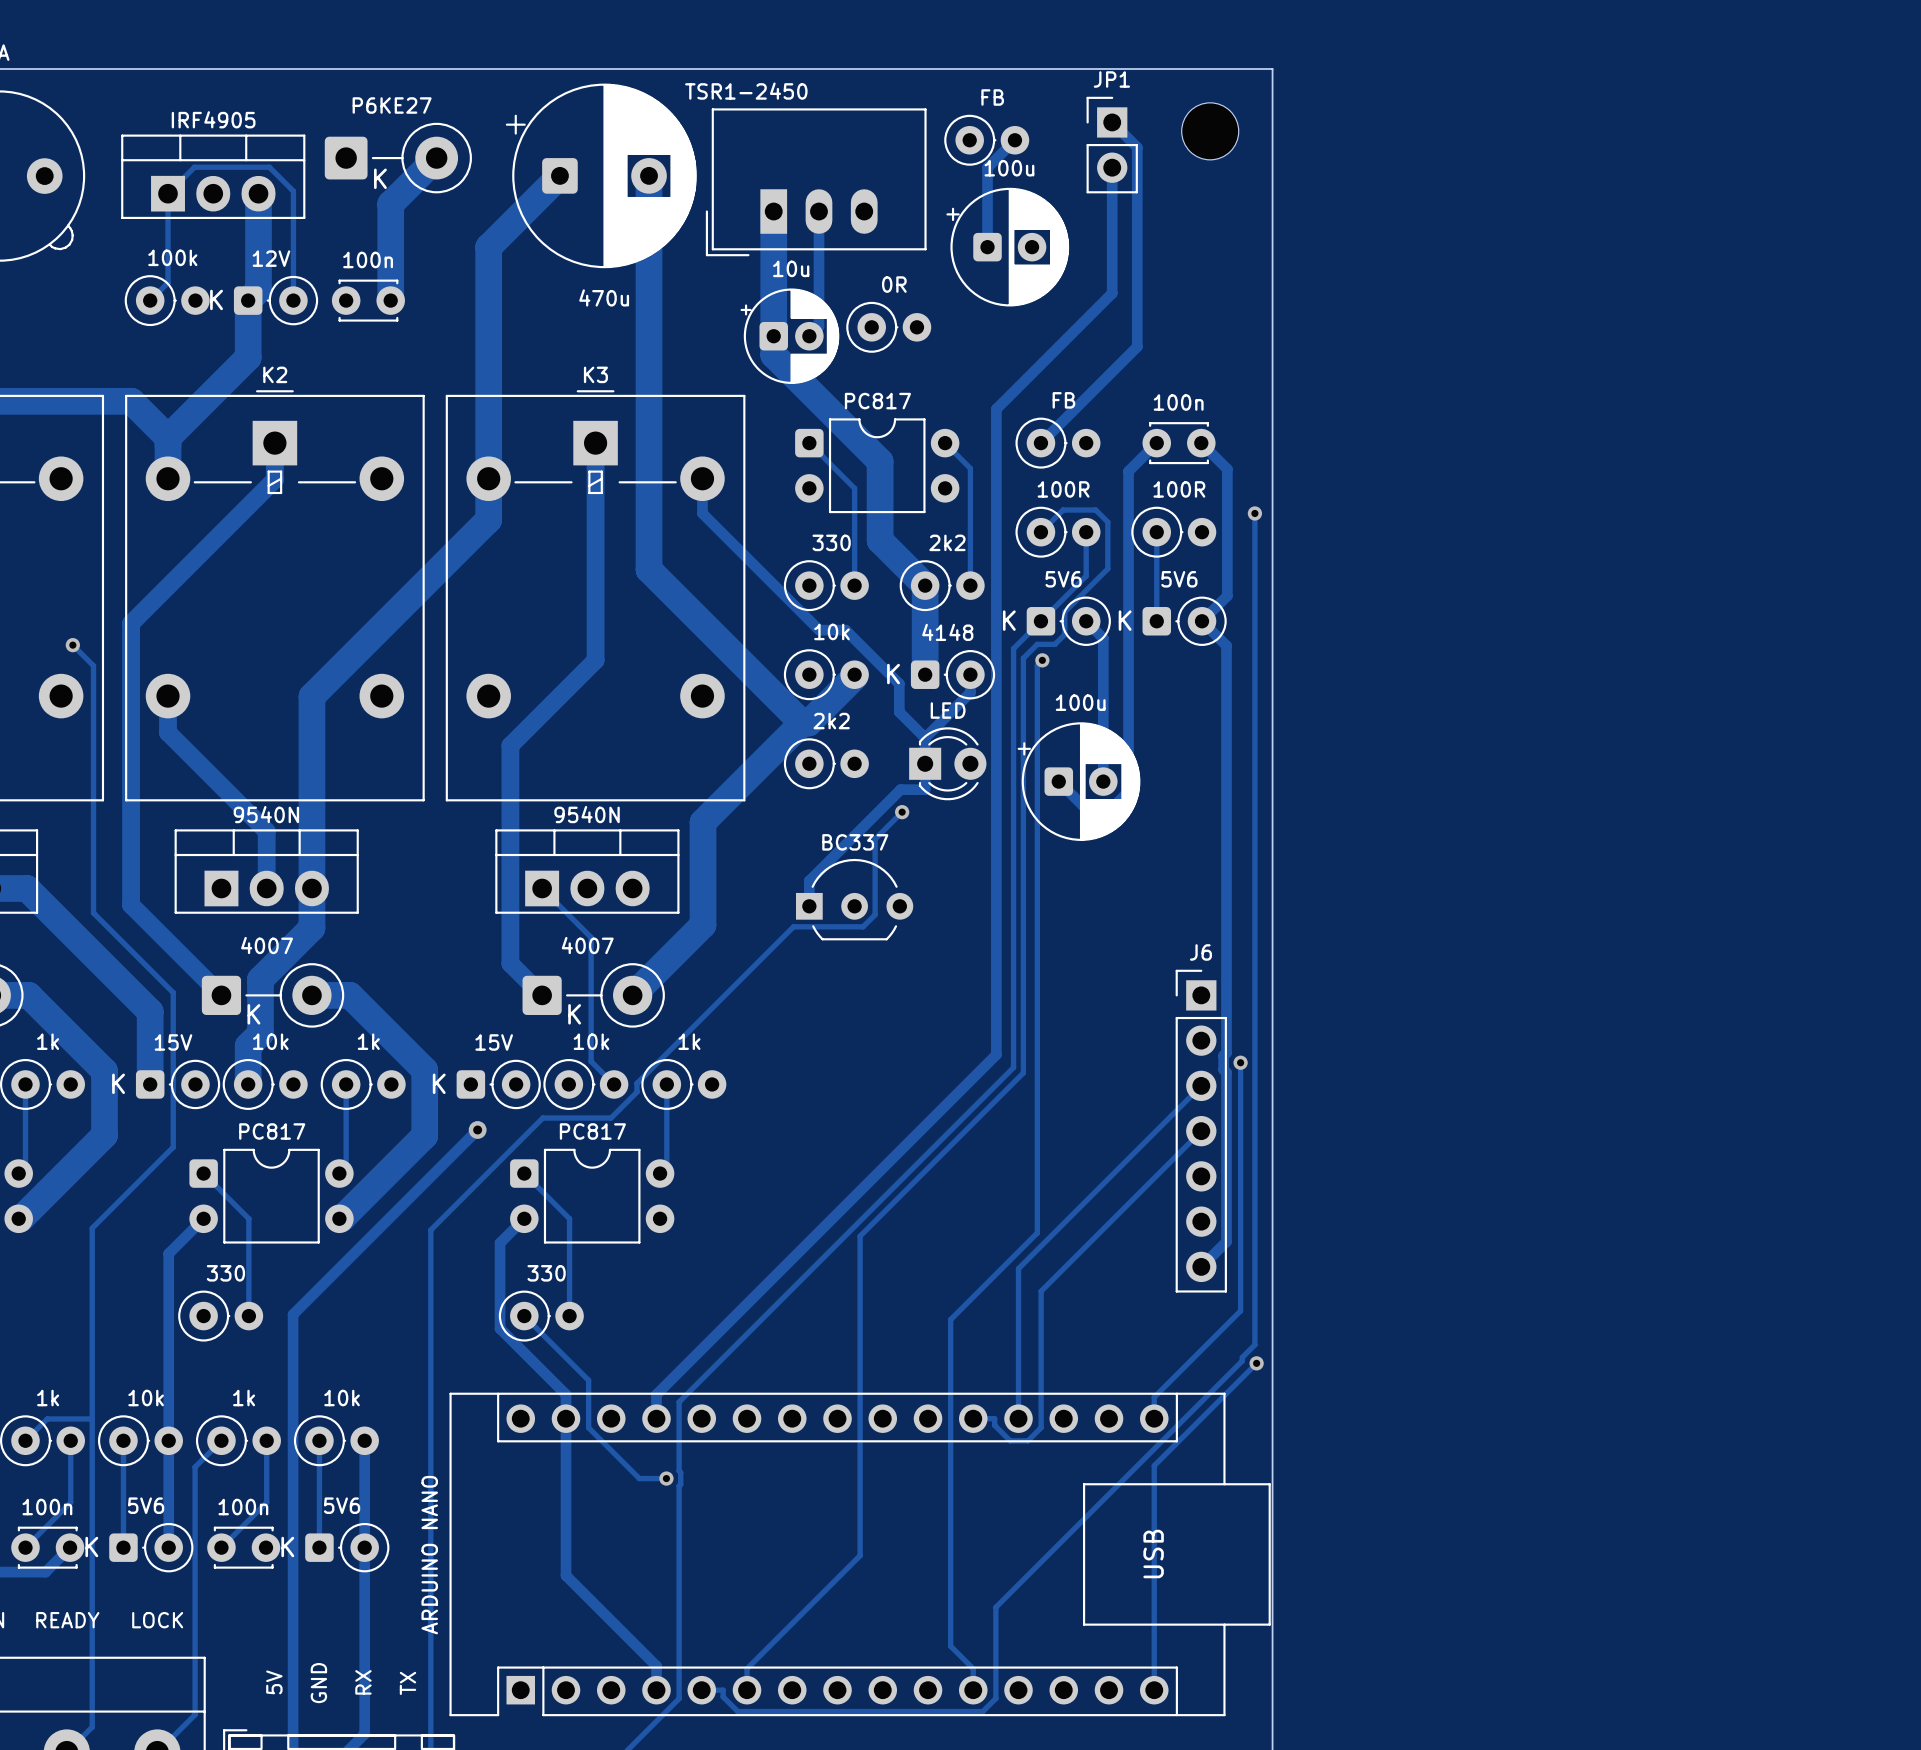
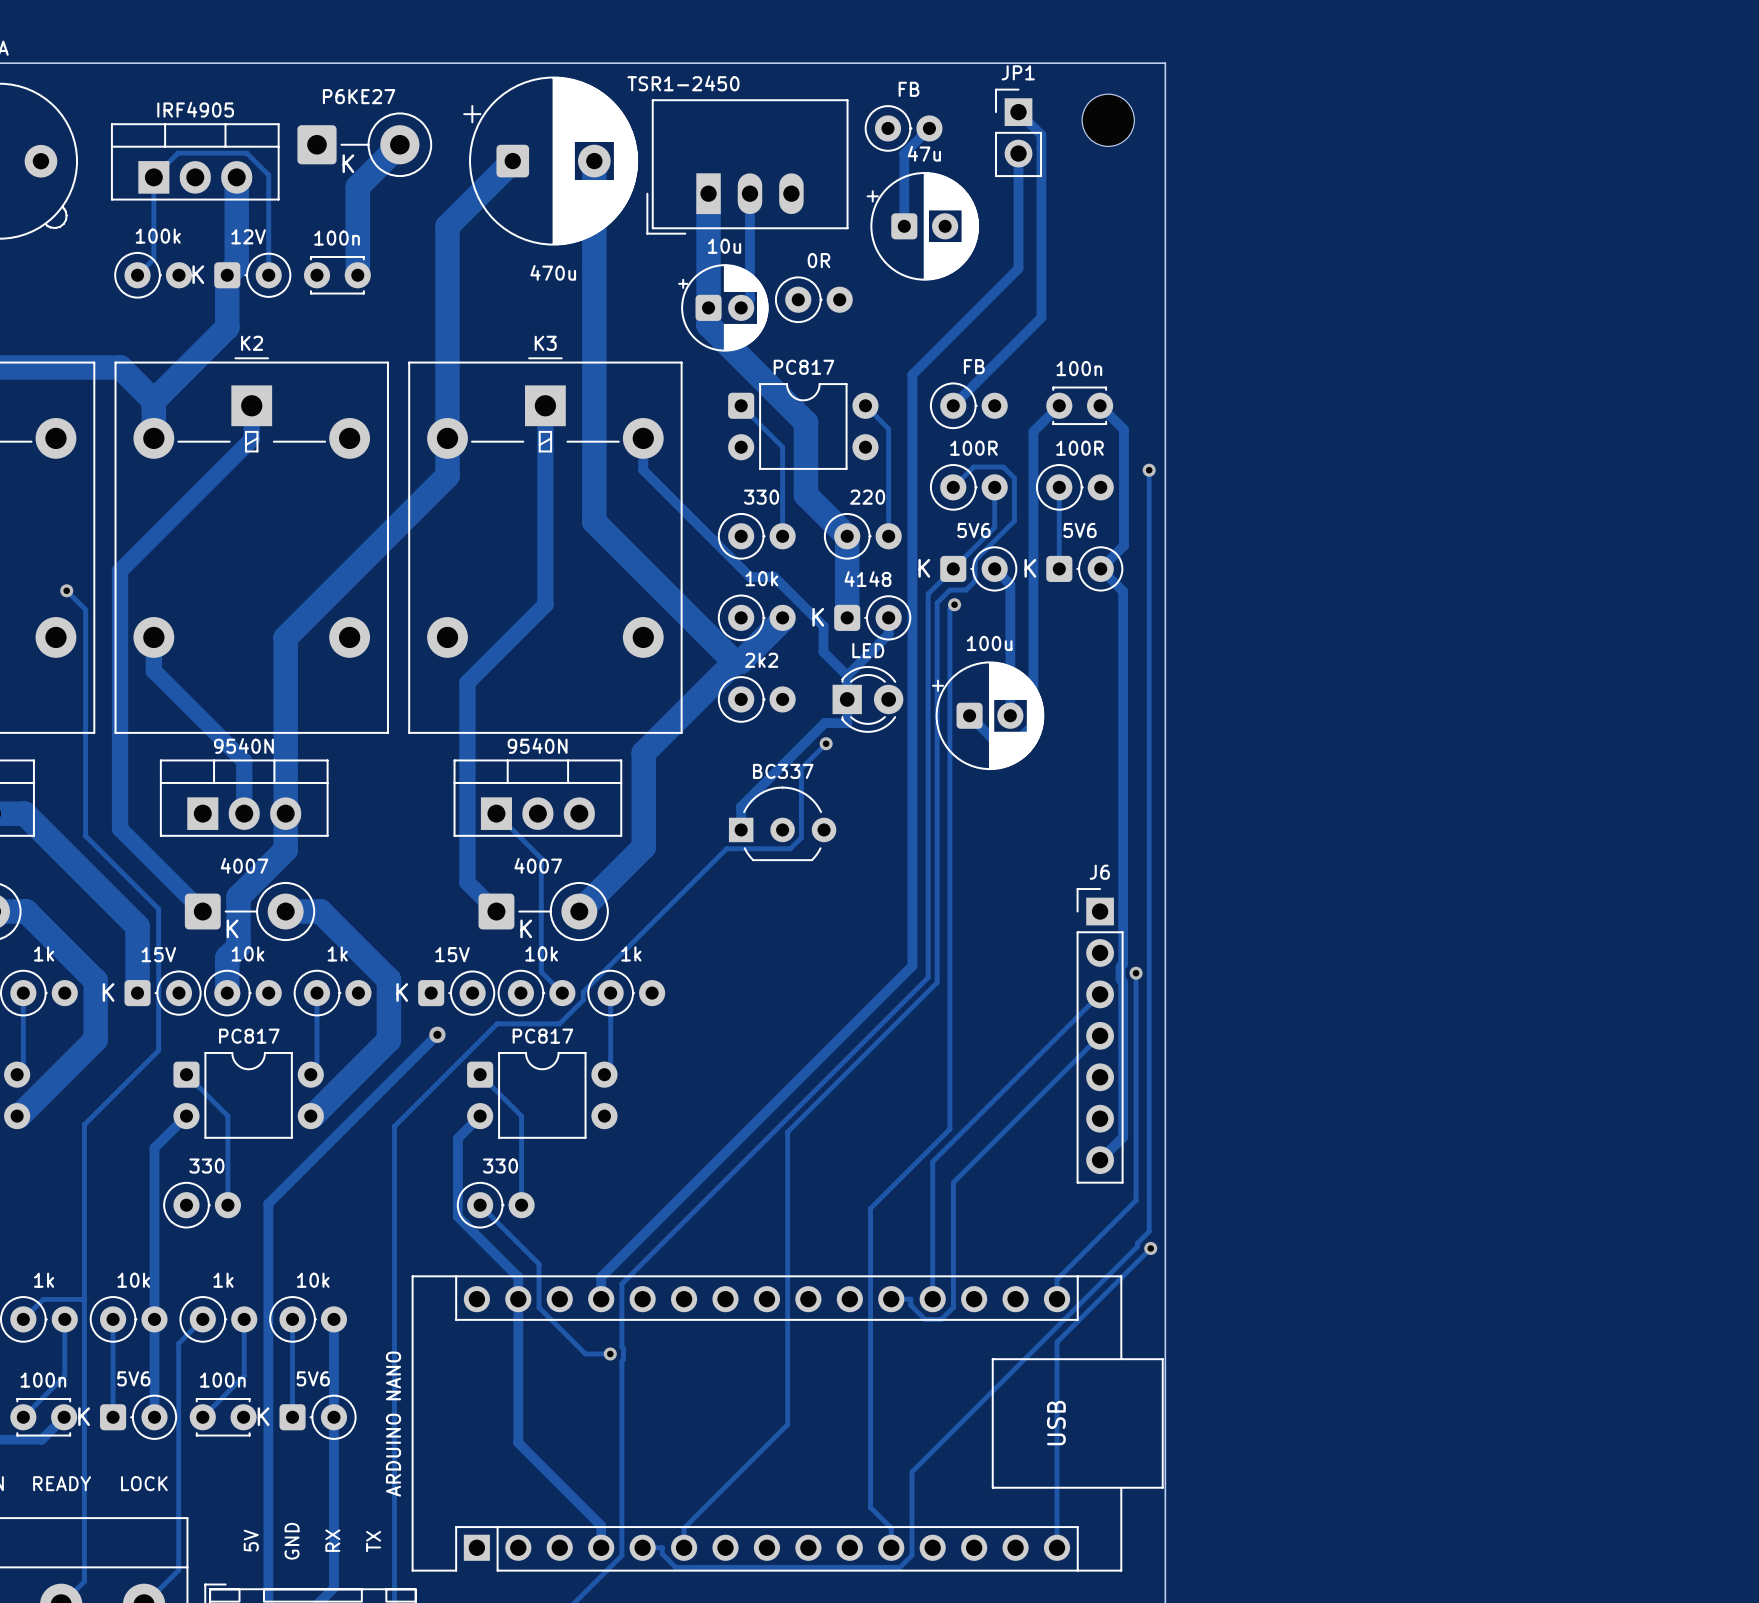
part text: 100u (1009, 168) -> 47u (924, 153)
part text: 2k2 (947, 542) -> 220 (867, 497)

